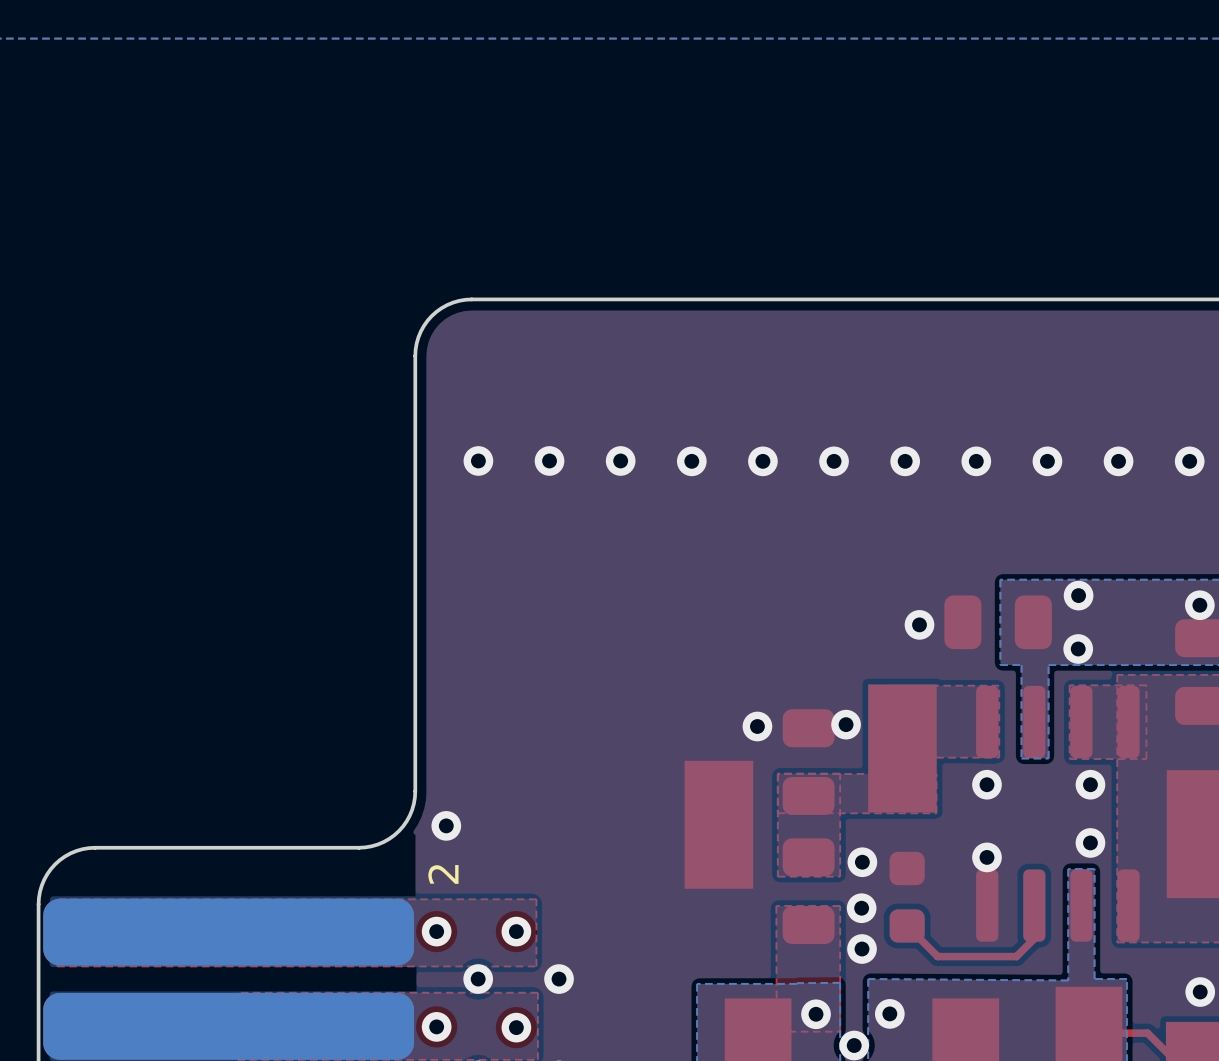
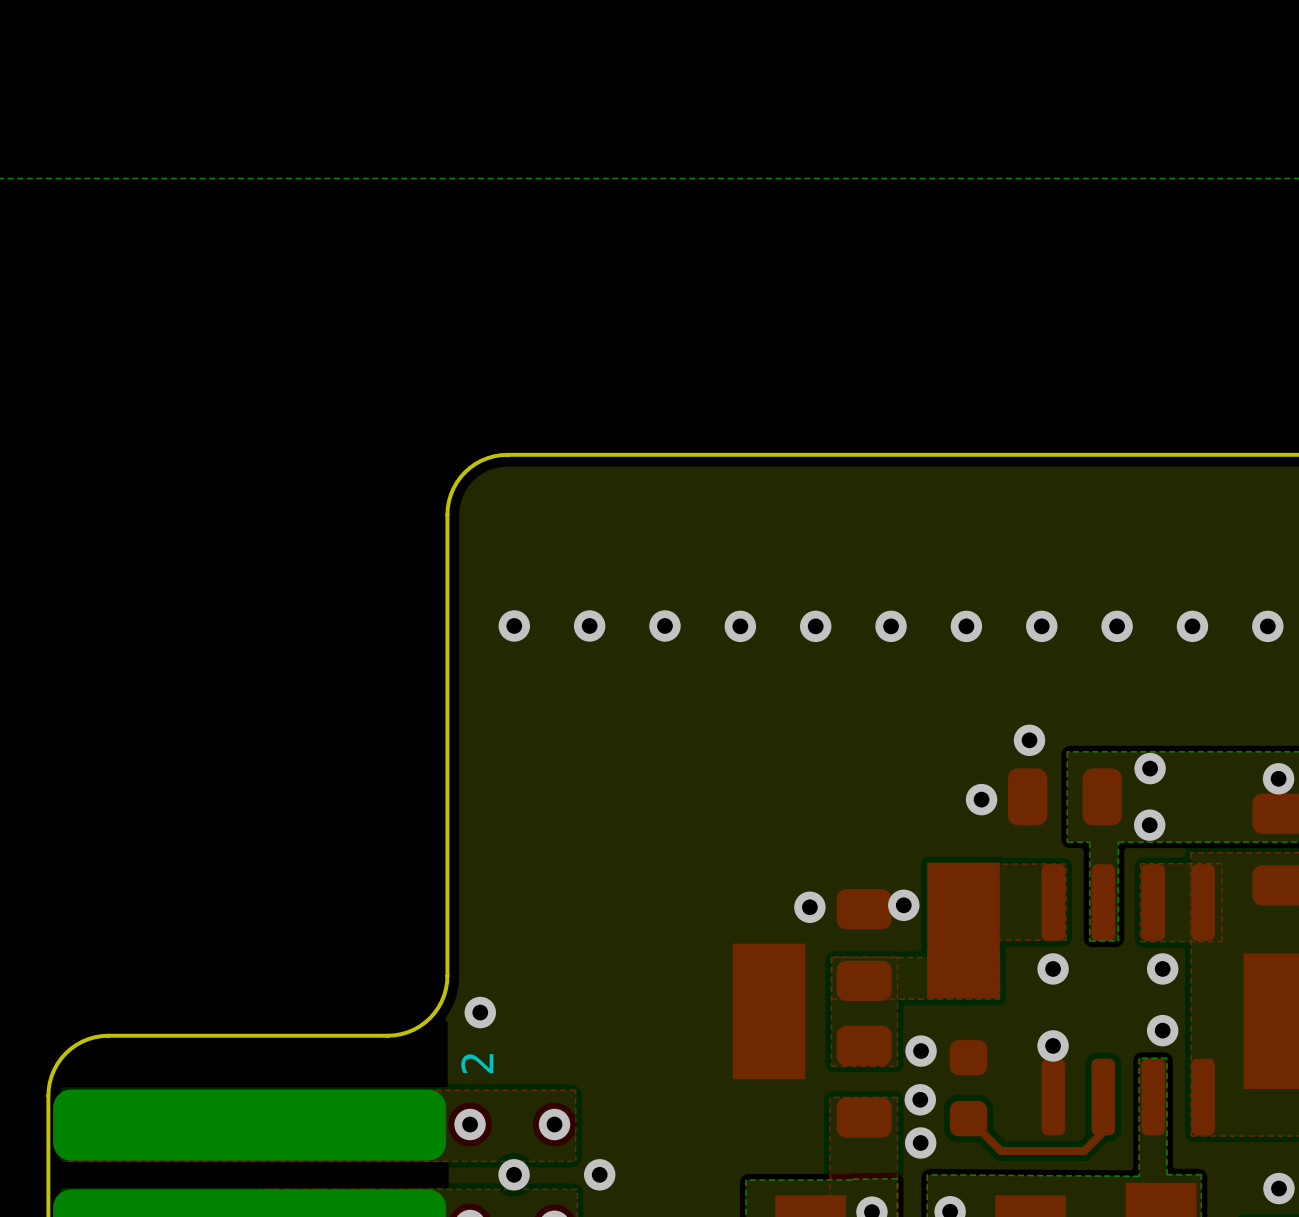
via: none -> (1029, 740)

